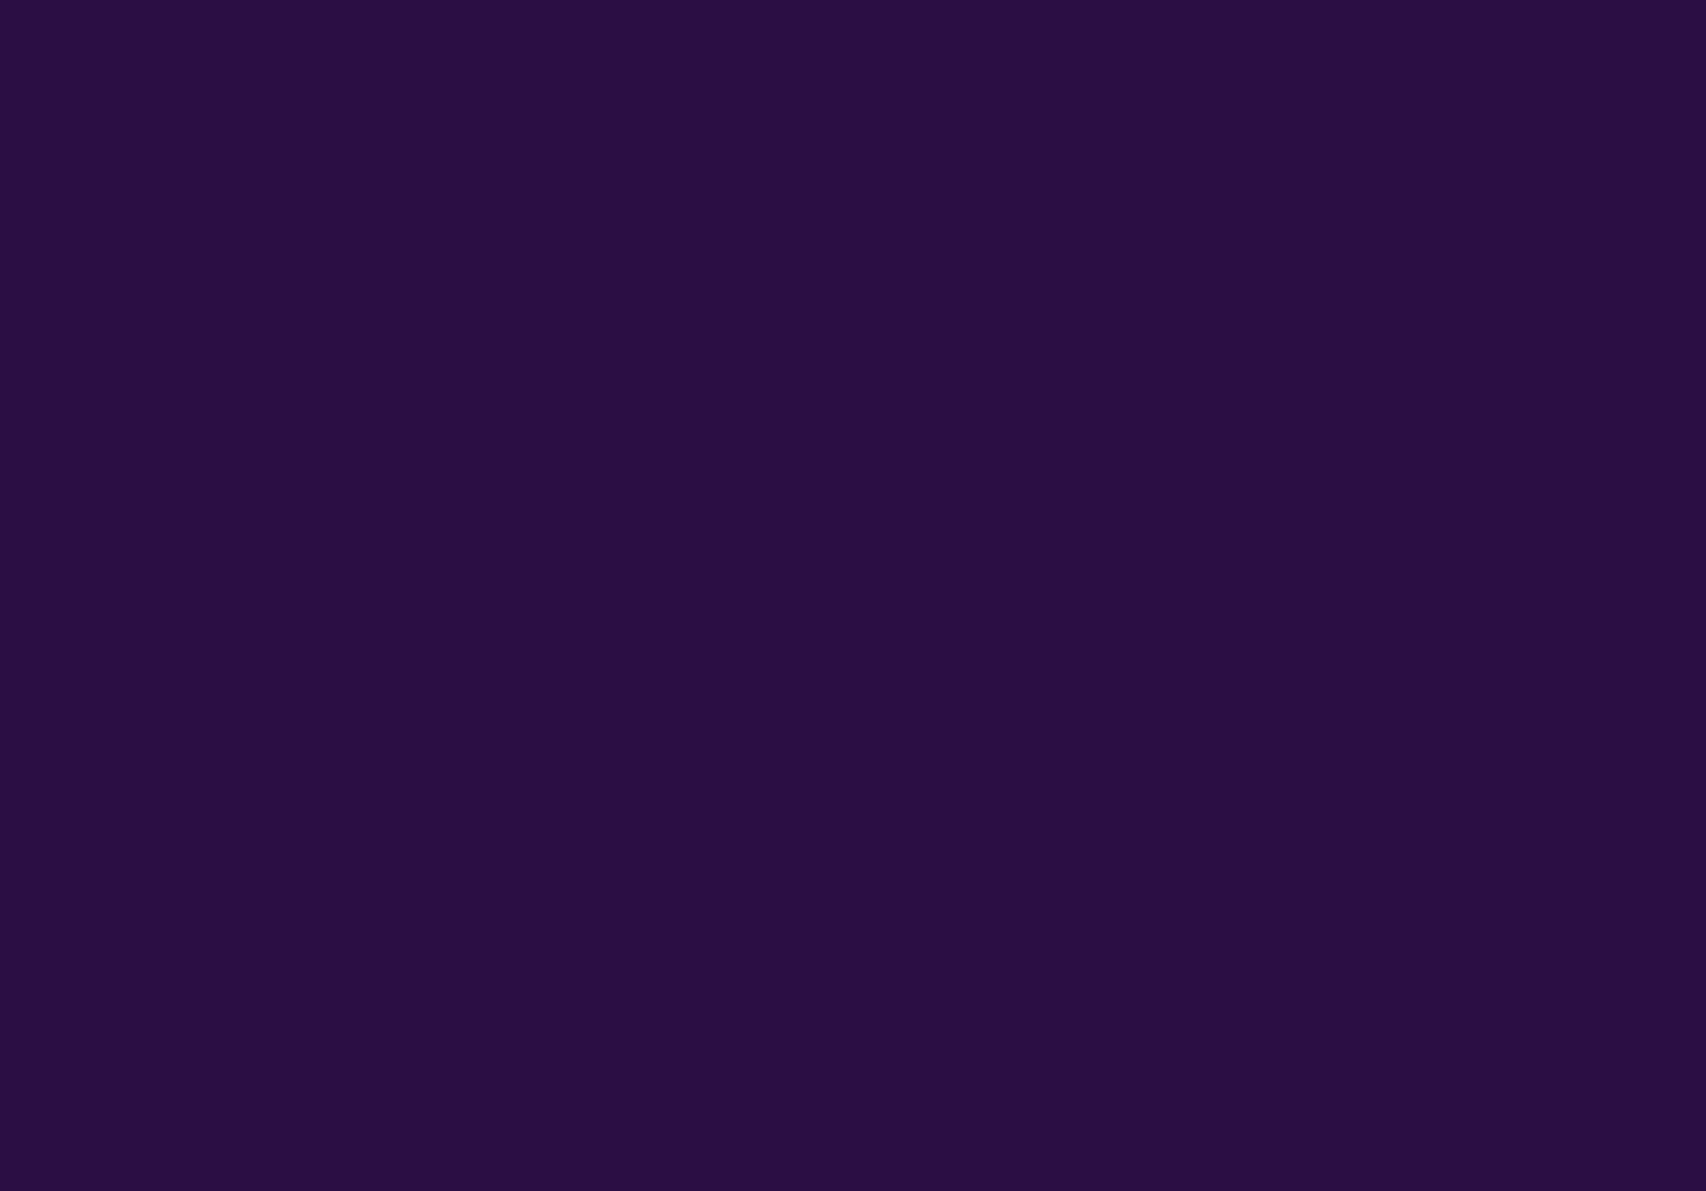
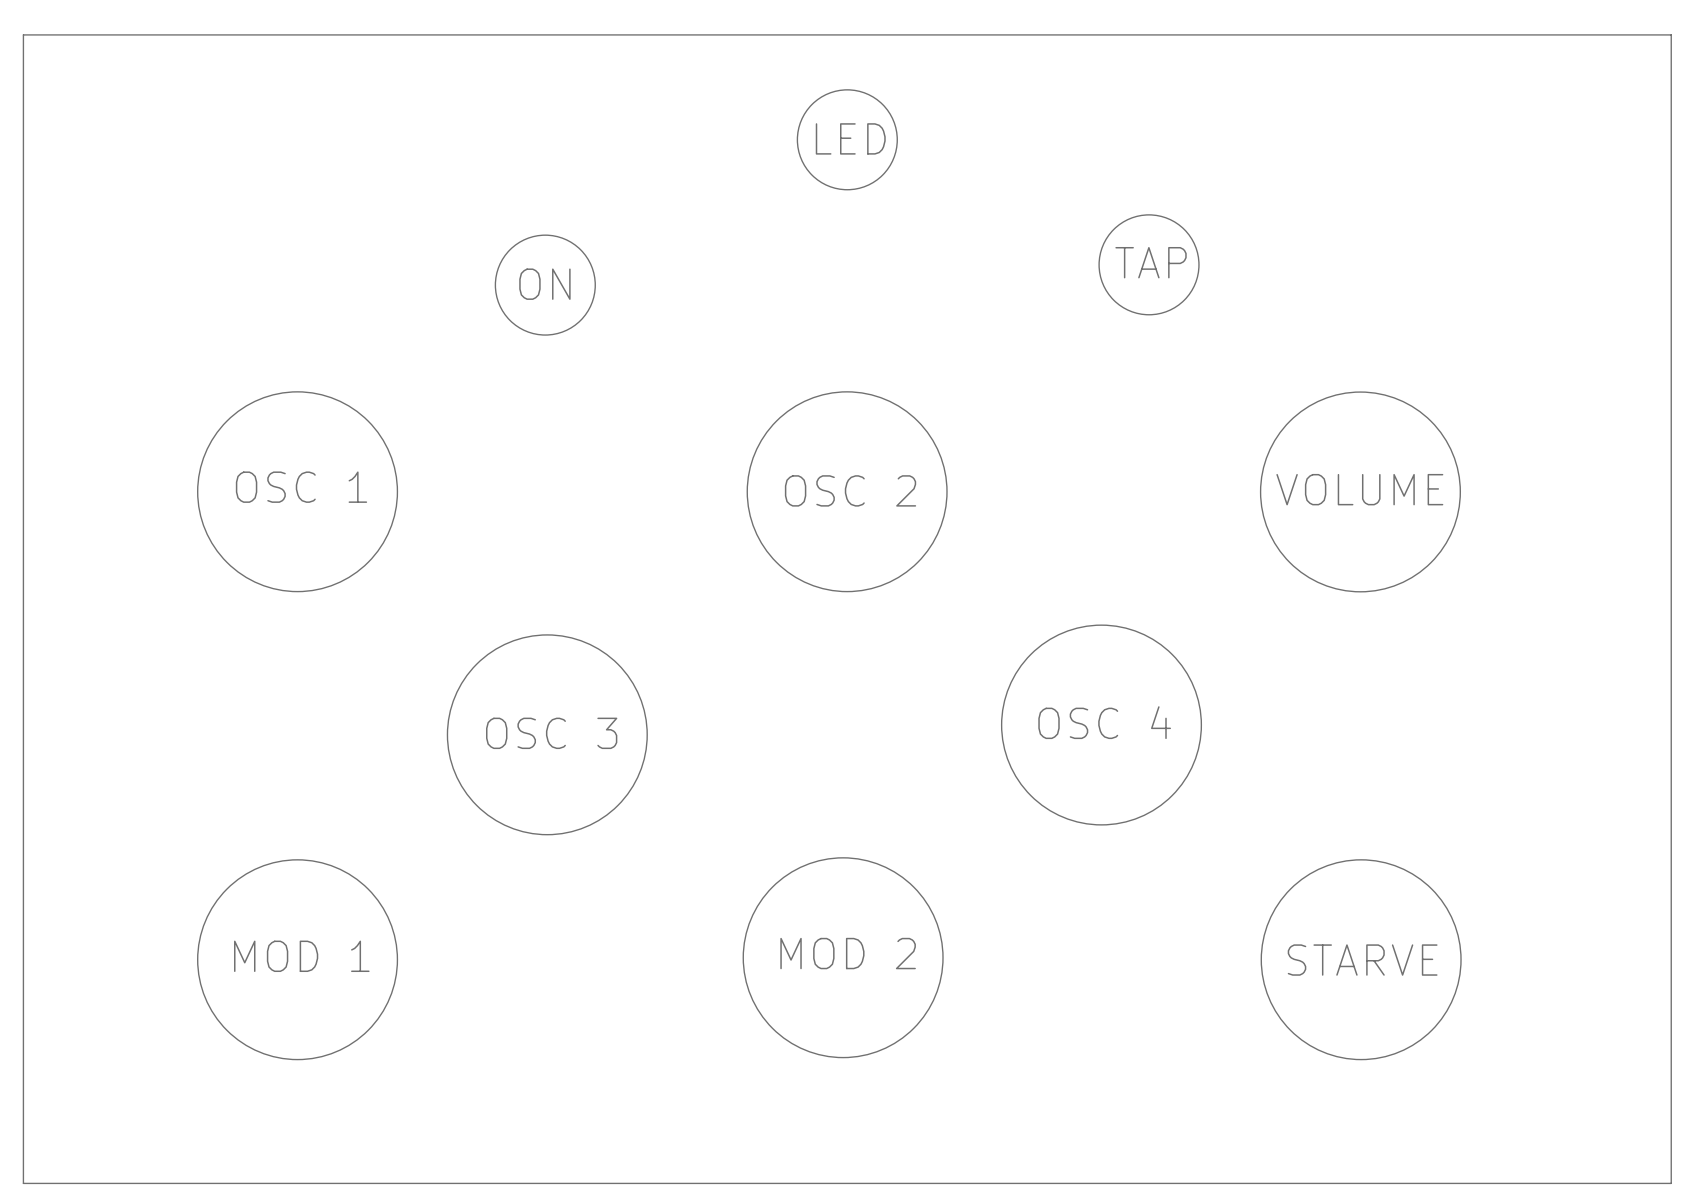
line: none -> (23, 34) (1671, 34) (1671, 1183) (23, 1183) (23, 34)
drawing: none -> [796, 89, 898, 191]
text: none -> LED (850, 138)
drawing: none -> [1098, 214, 1200, 316]
drawing: none -> [494, 234, 596, 336]
text: none -> TAP (1151, 262)
text: none -> ON (544, 284)
drawing: none -> [197, 391, 398, 593]
drawing: none -> [746, 391, 948, 593]
drawing: none -> [1260, 391, 1461, 593]
text: none -> OSC 1 (301, 487)
text: none -> VOLUME (1359, 489)
text: none -> OSC 2 (850, 490)
drawing: none -> [1001, 624, 1202, 826]
drawing: none -> [446, 634, 648, 836]
text: none -> OSC 4 (1104, 722)
text: none -> OSC 3 (551, 733)
drawing: none -> [742, 857, 944, 1059]
drawing: none -> [197, 859, 398, 1061]
drawing: none -> [1260, 859, 1462, 1061]
text: none -> MOD 2 (848, 953)
text: none -> MOD 1 (301, 956)
text: none -> STARVE (1362, 960)

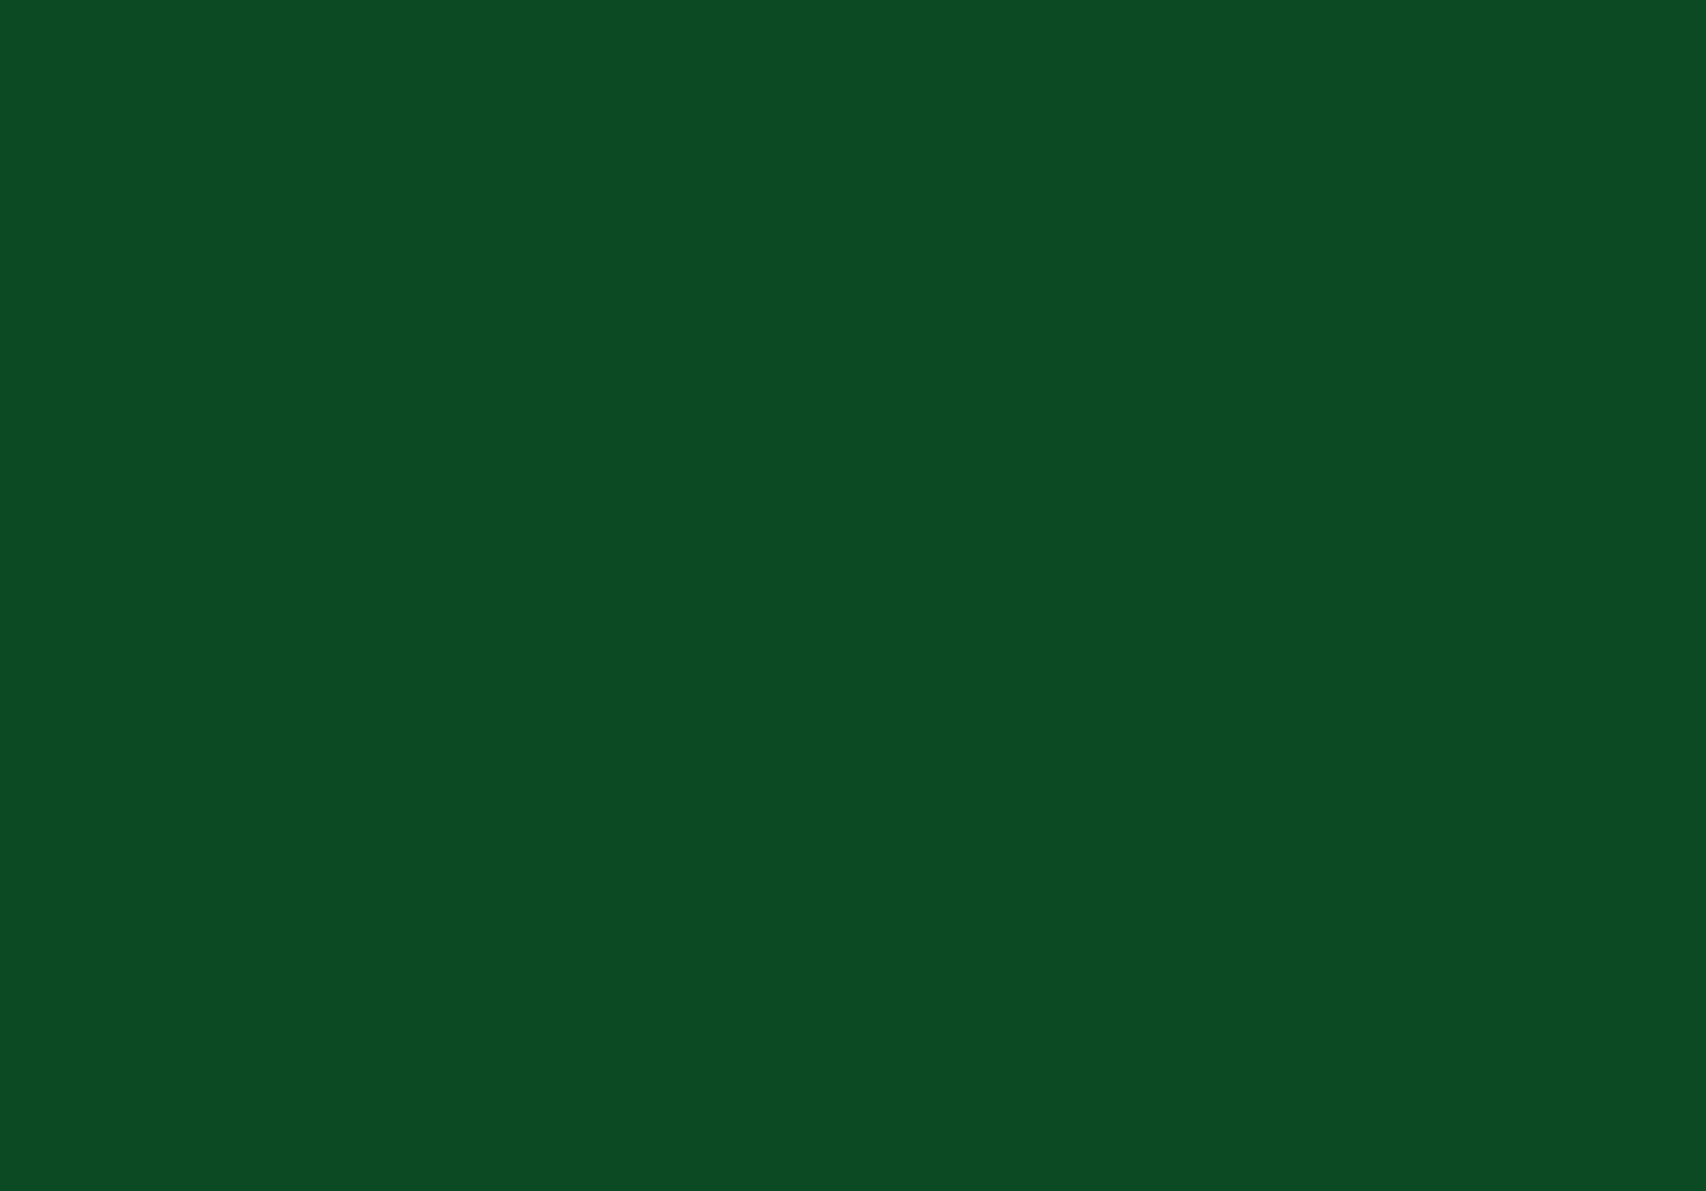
line: (23, 34) (1671, 34) (1671, 1183) (23, 1183) (23, 34) -> none
drawing: [796, 89, 898, 191] -> none
text: LED (850, 138) -> none
drawing: [1098, 214, 1200, 316] -> none
drawing: [494, 234, 596, 336] -> none
text: TAP (1151, 262) -> none
text: ON (544, 284) -> none
drawing: [197, 391, 398, 593] -> none
drawing: [746, 391, 948, 593] -> none
drawing: [1260, 391, 1461, 593] -> none
text: OSC 1 (301, 487) -> none
text: VOLUME (1359, 489) -> none
text: OSC 2 (850, 490) -> none
drawing: [1001, 624, 1202, 826] -> none
drawing: [446, 634, 648, 836] -> none
text: OSC 4 (1104, 722) -> none
text: OSC 3 (551, 733) -> none
drawing: [742, 857, 944, 1059] -> none
drawing: [197, 859, 398, 1061] -> none
drawing: [1260, 859, 1462, 1061] -> none
text: MOD 2 (848, 953) -> none
text: MOD 1 (301, 956) -> none
text: STARVE (1362, 960) -> none

